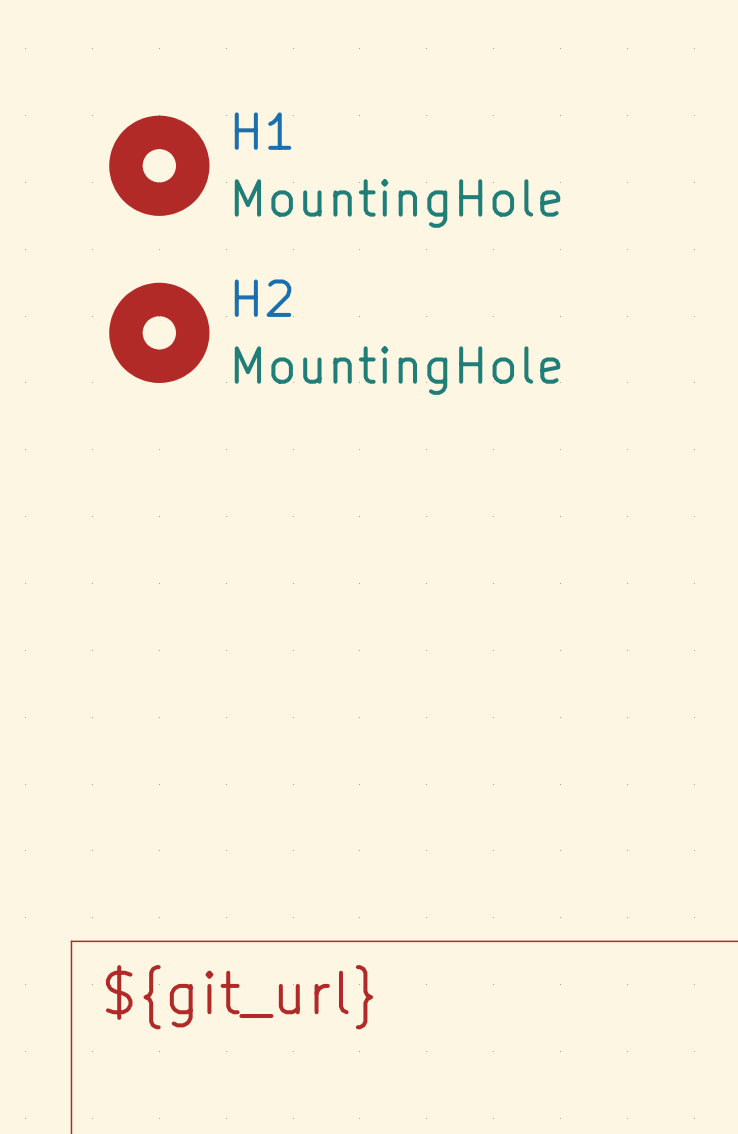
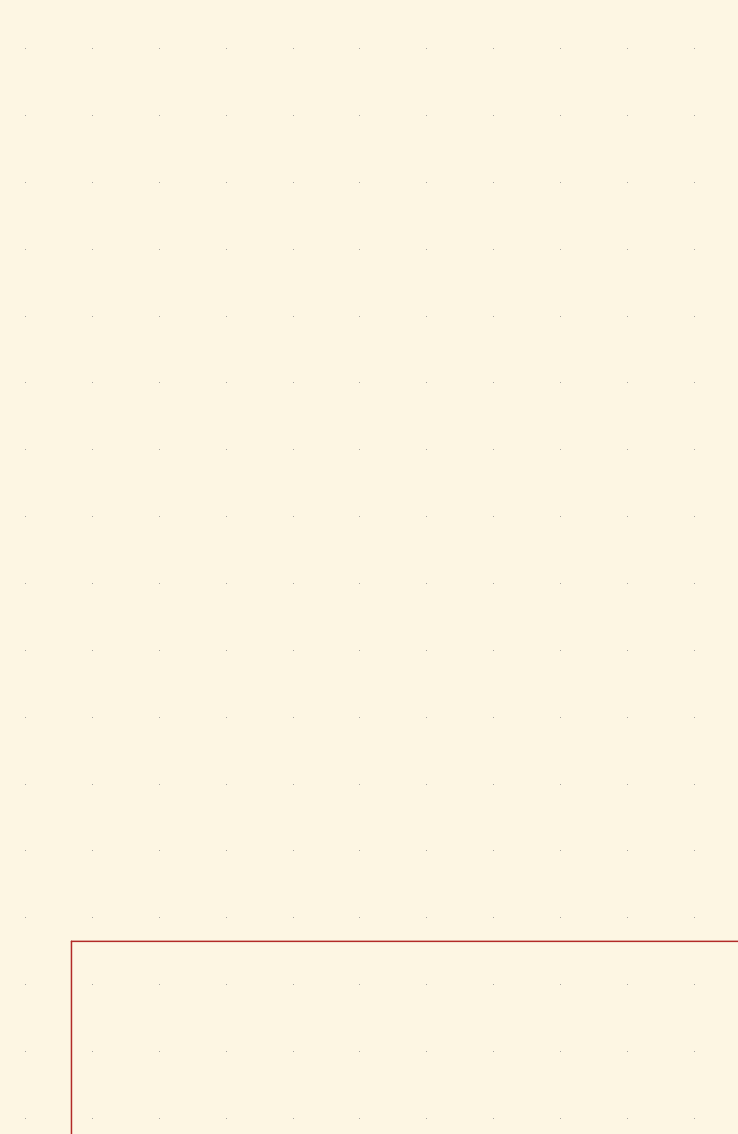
H1: MountingHole (159, 165) -> none
H2: MountingHole (159, 332) -> none
title block: ${git_url} (239, 997) -> none

